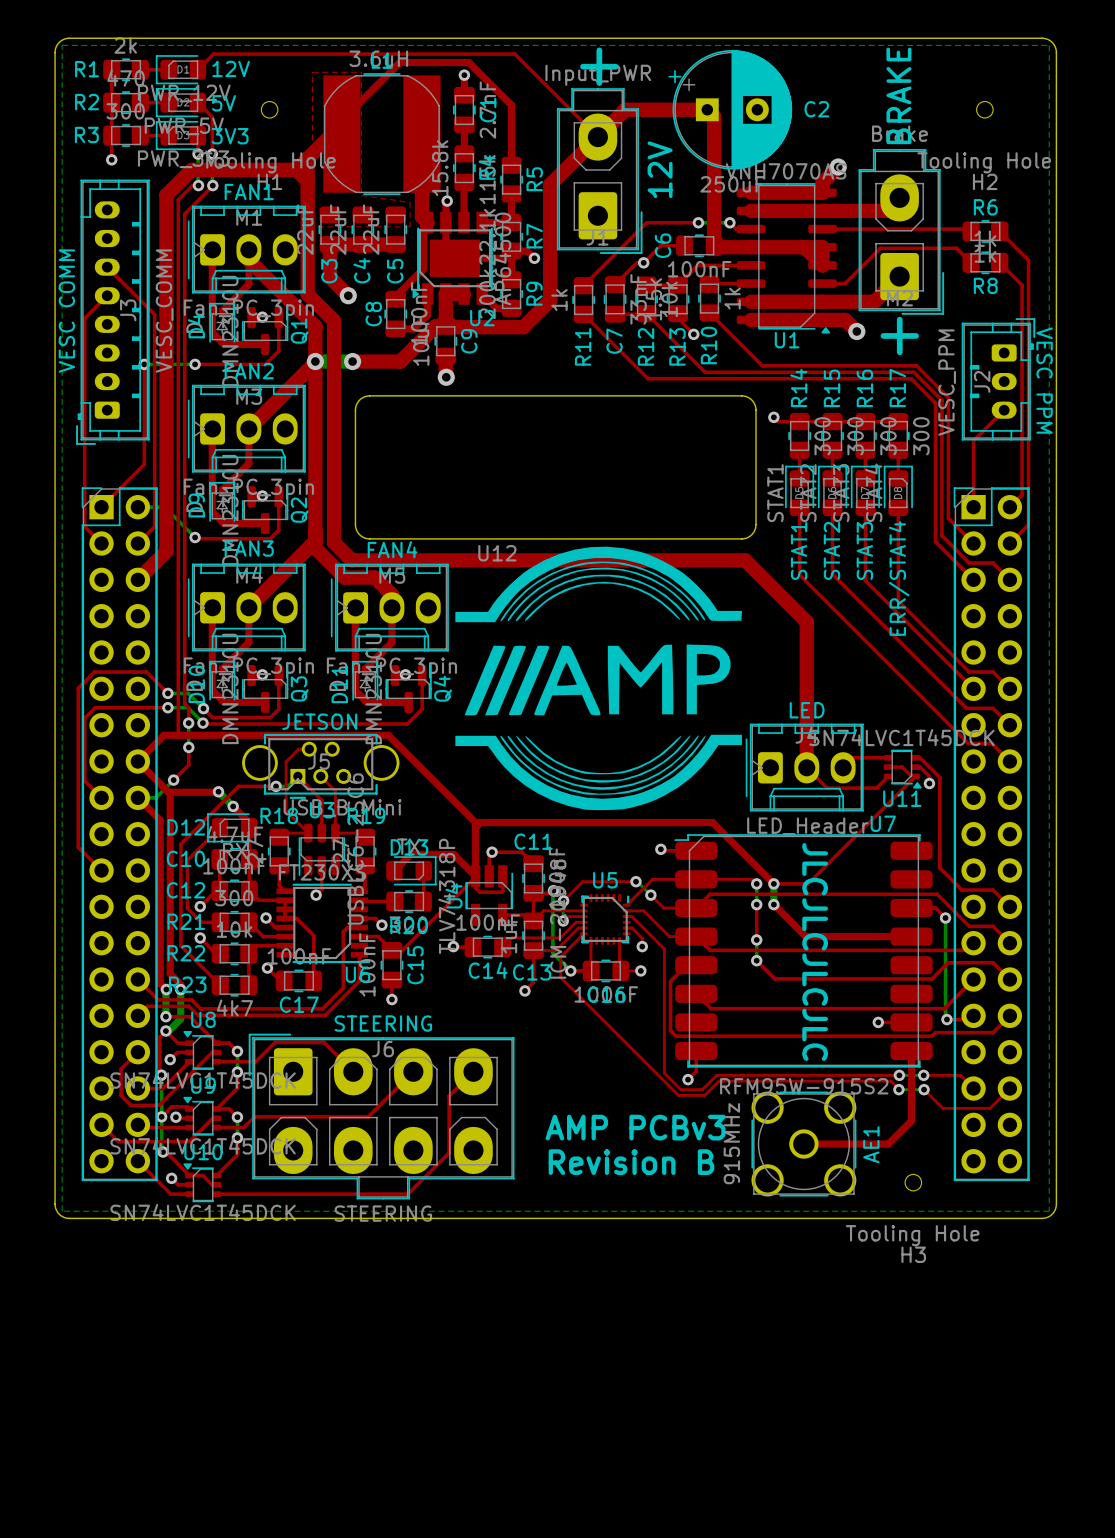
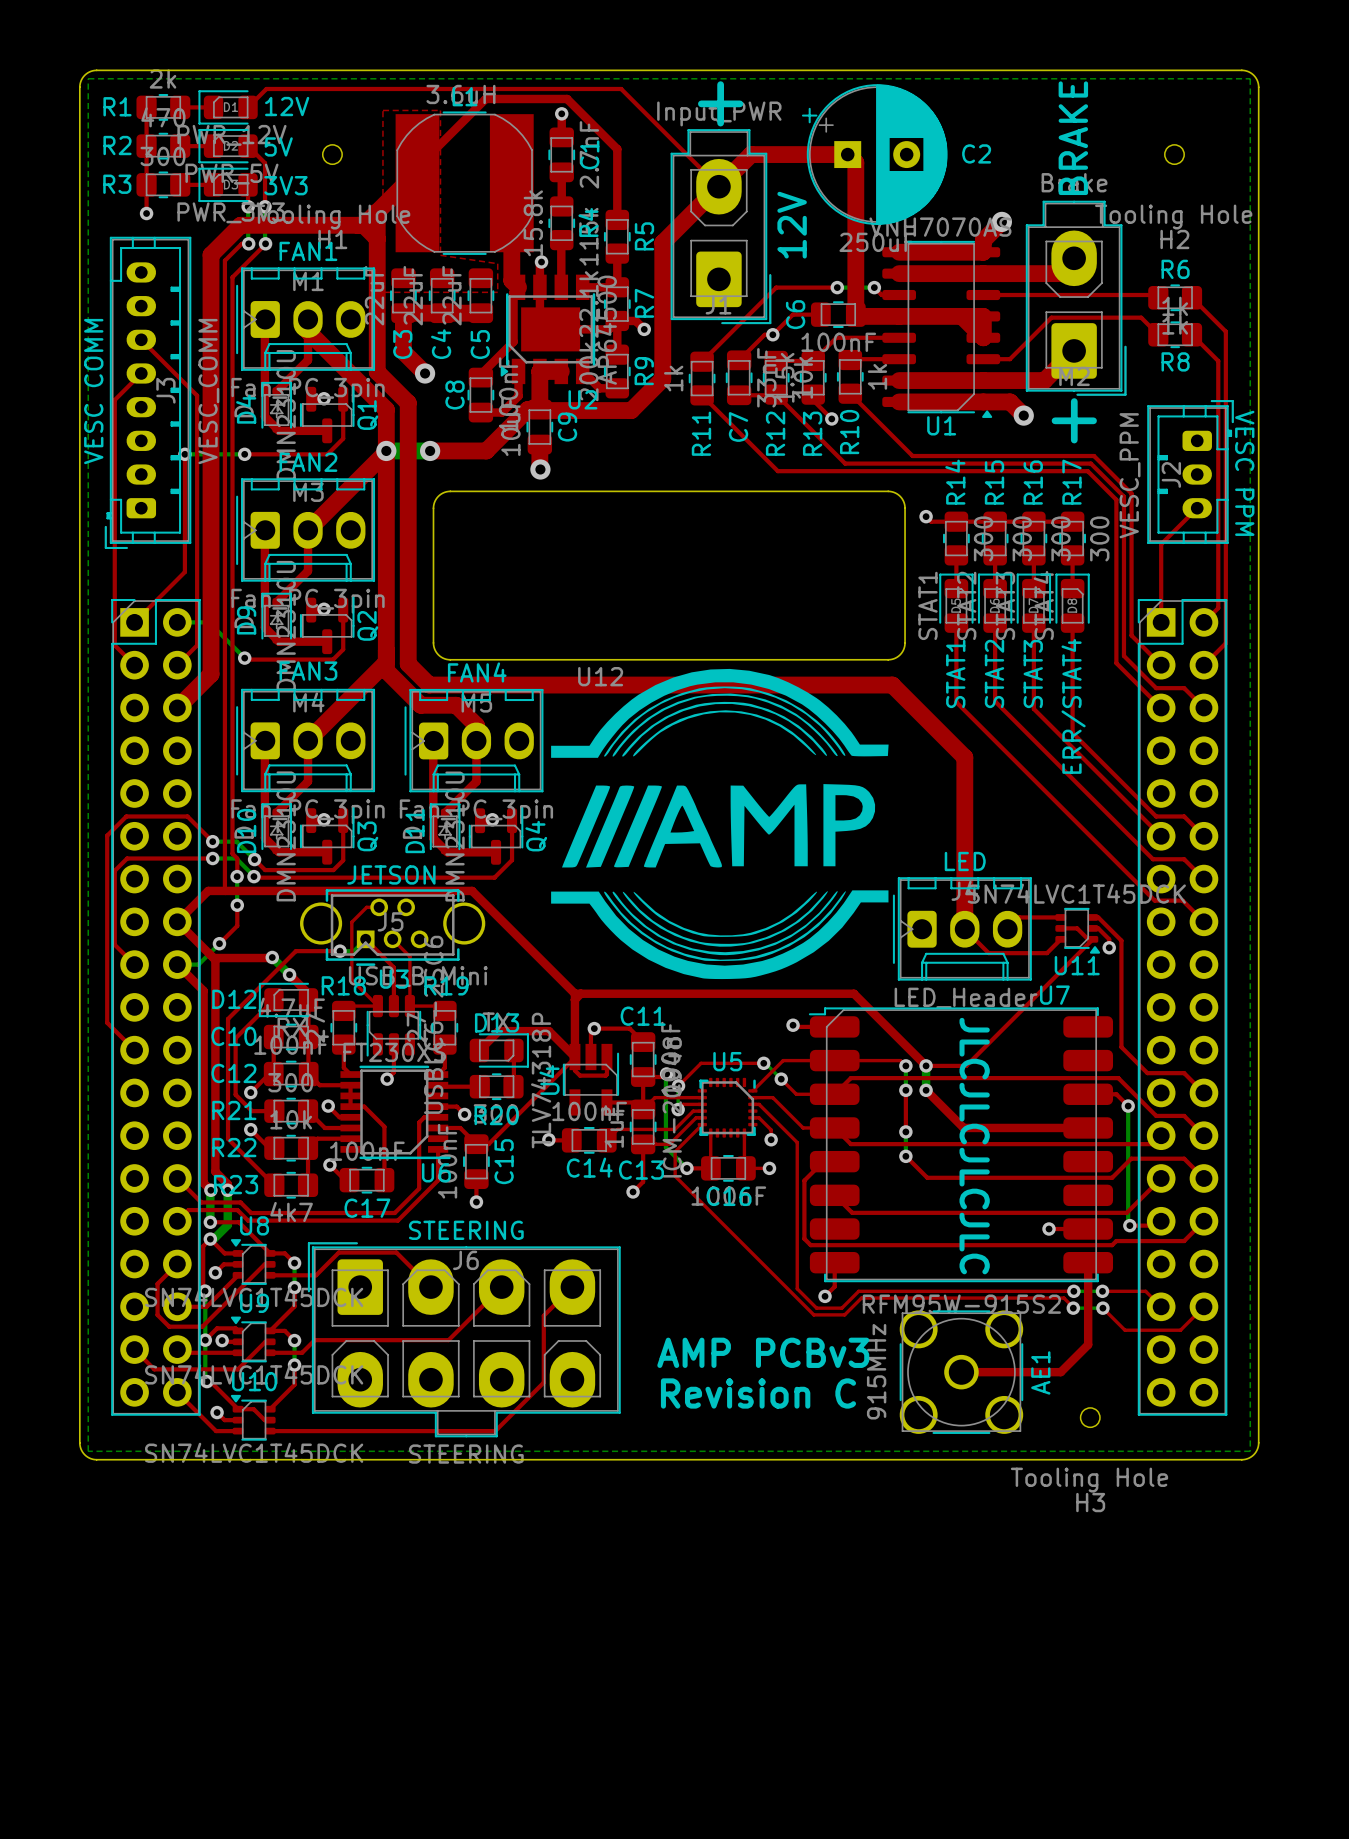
text: Revision B (631, 1162) -> Revision C (758, 1393)

